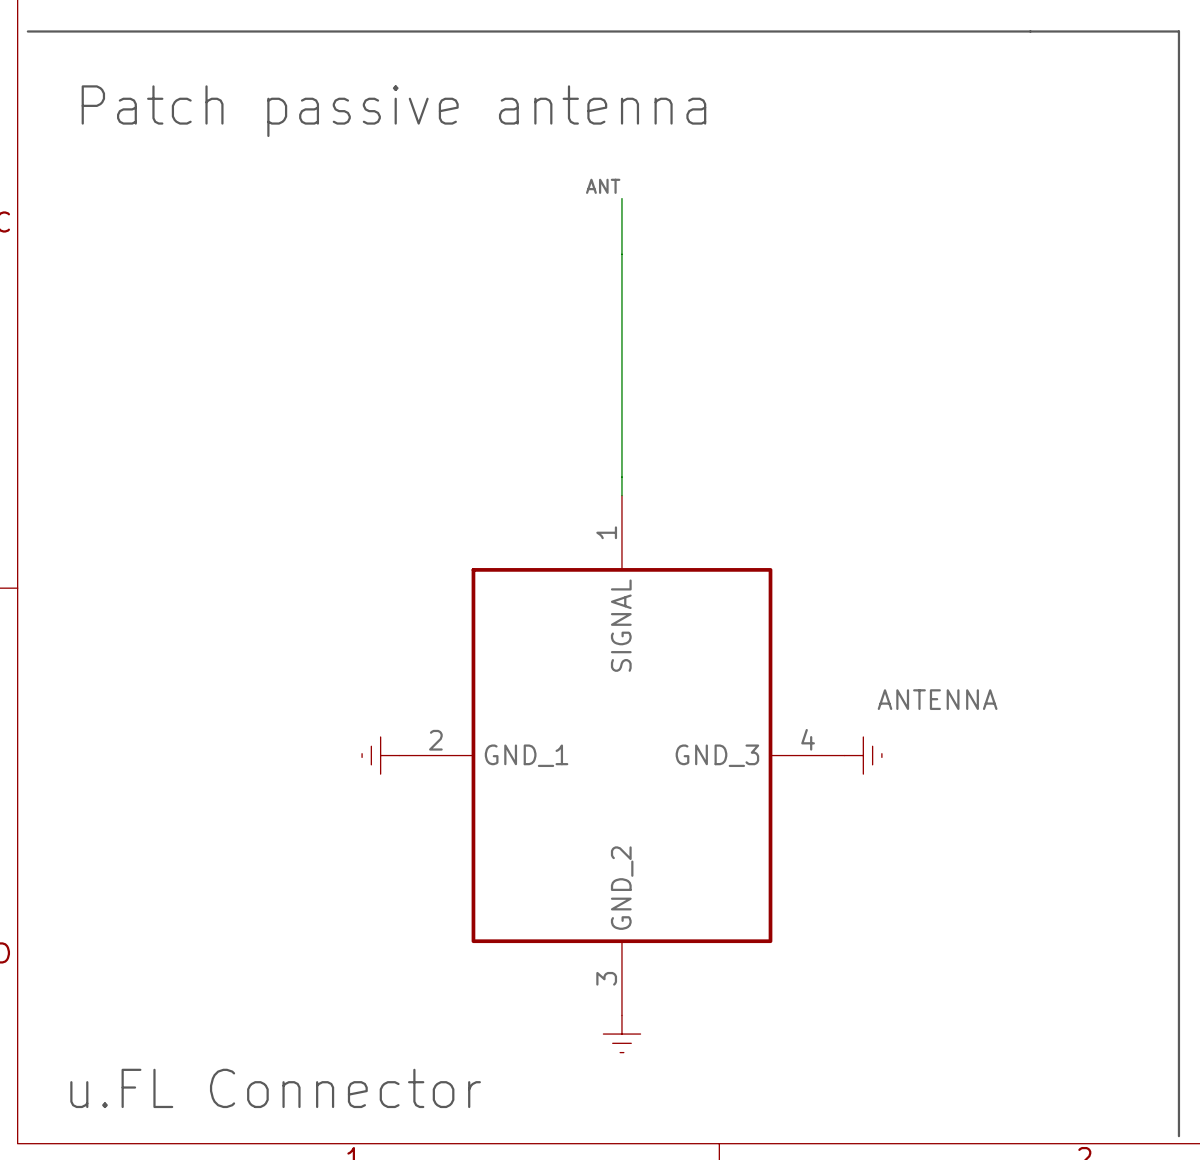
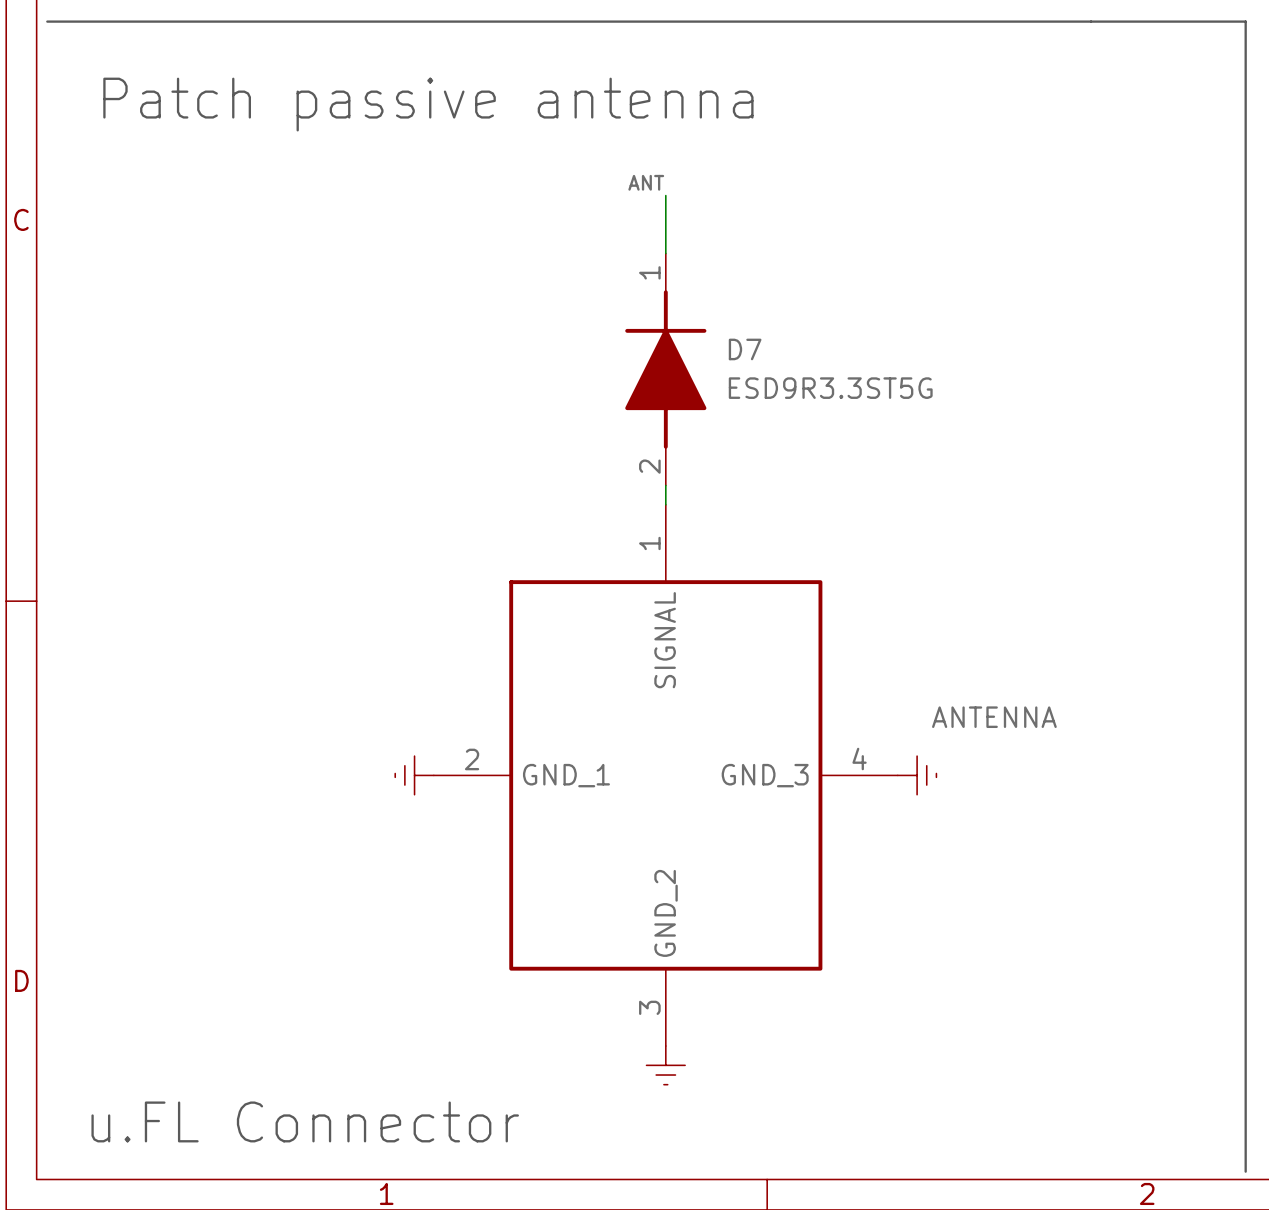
D7: none -> ESD9R3.3ST5G (665, 369)

